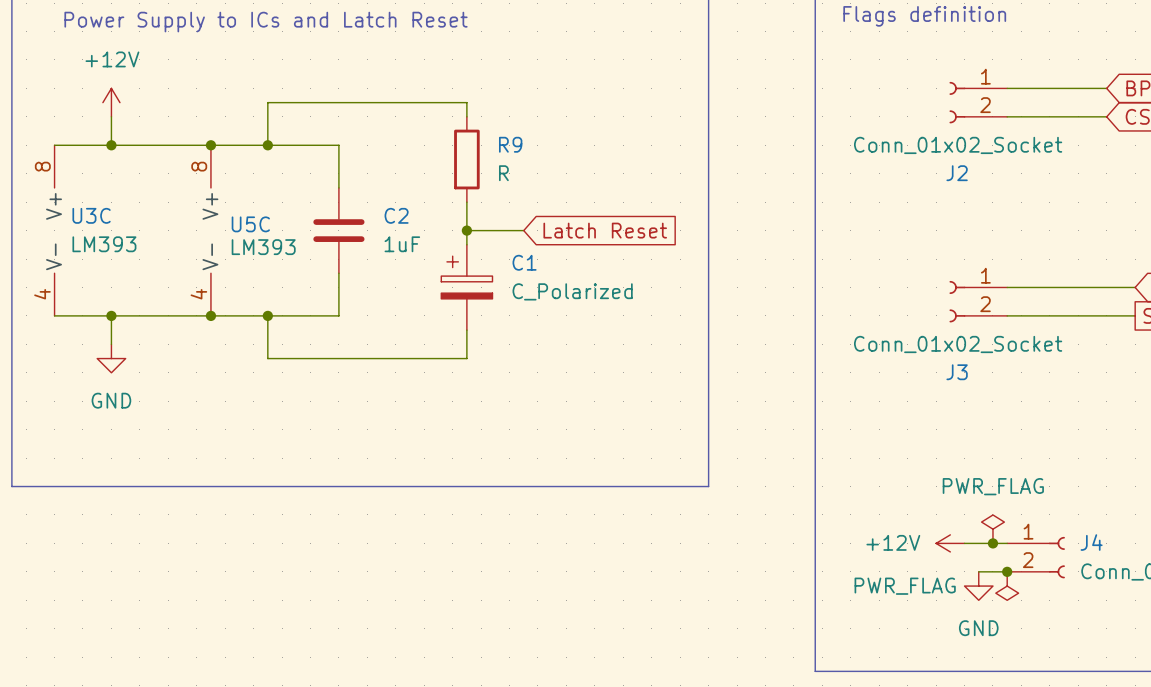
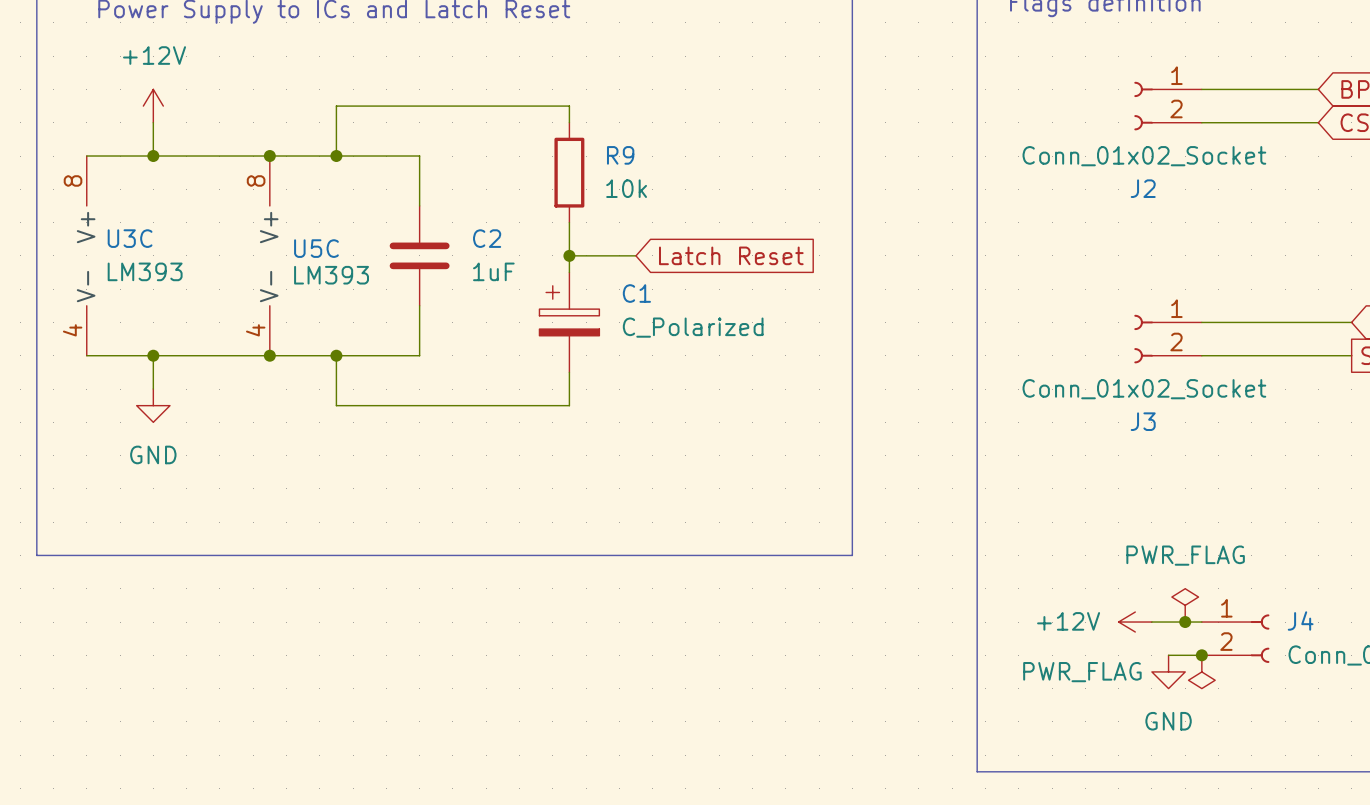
R9 value: R (503, 173) -> 10k (626, 188)

